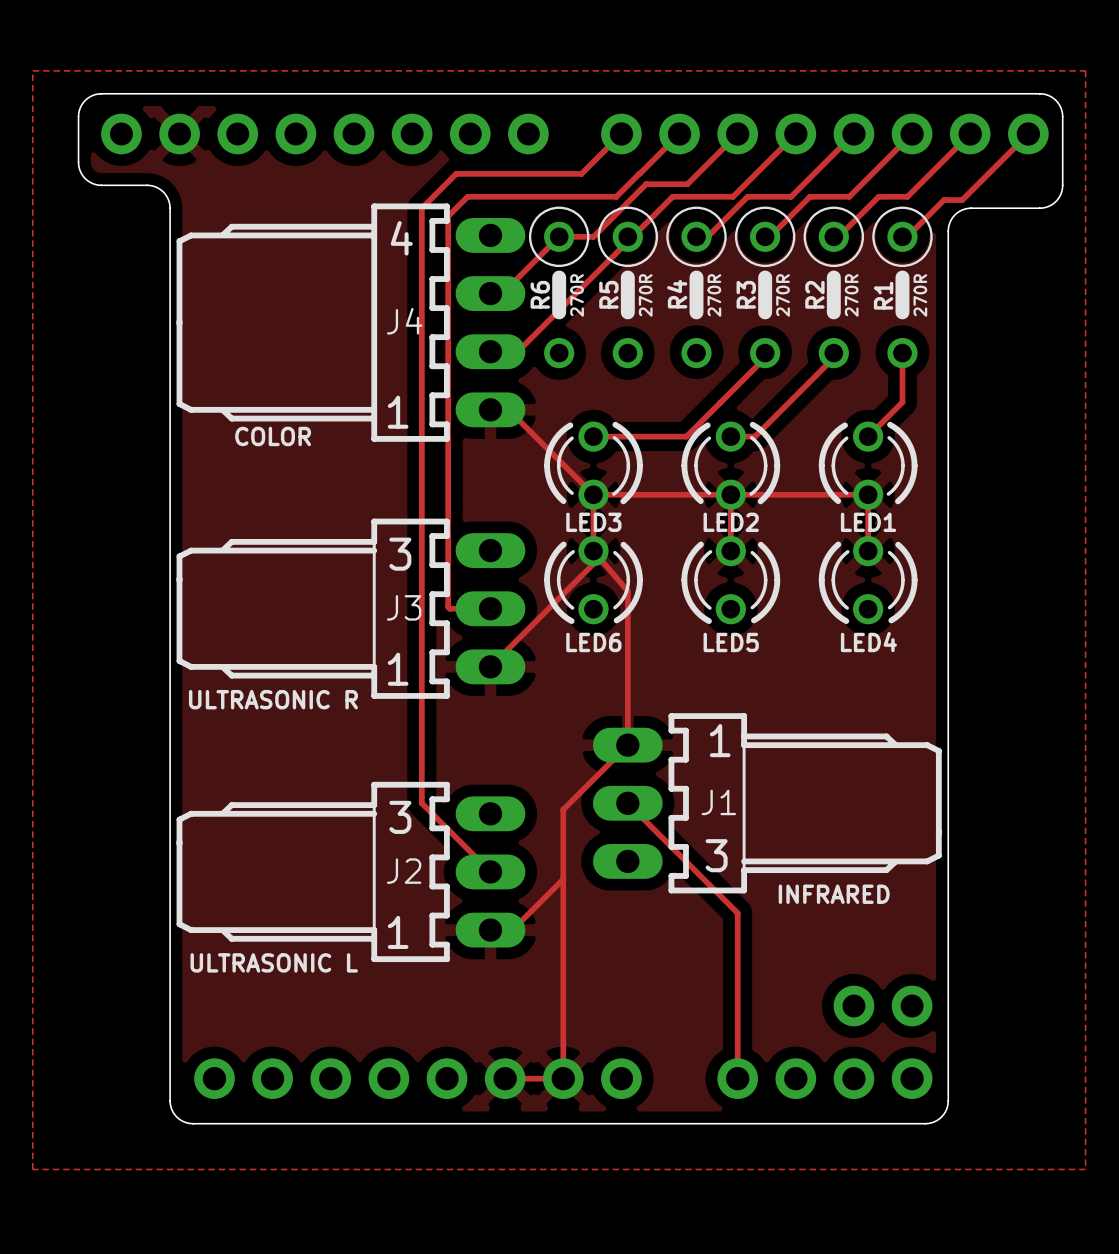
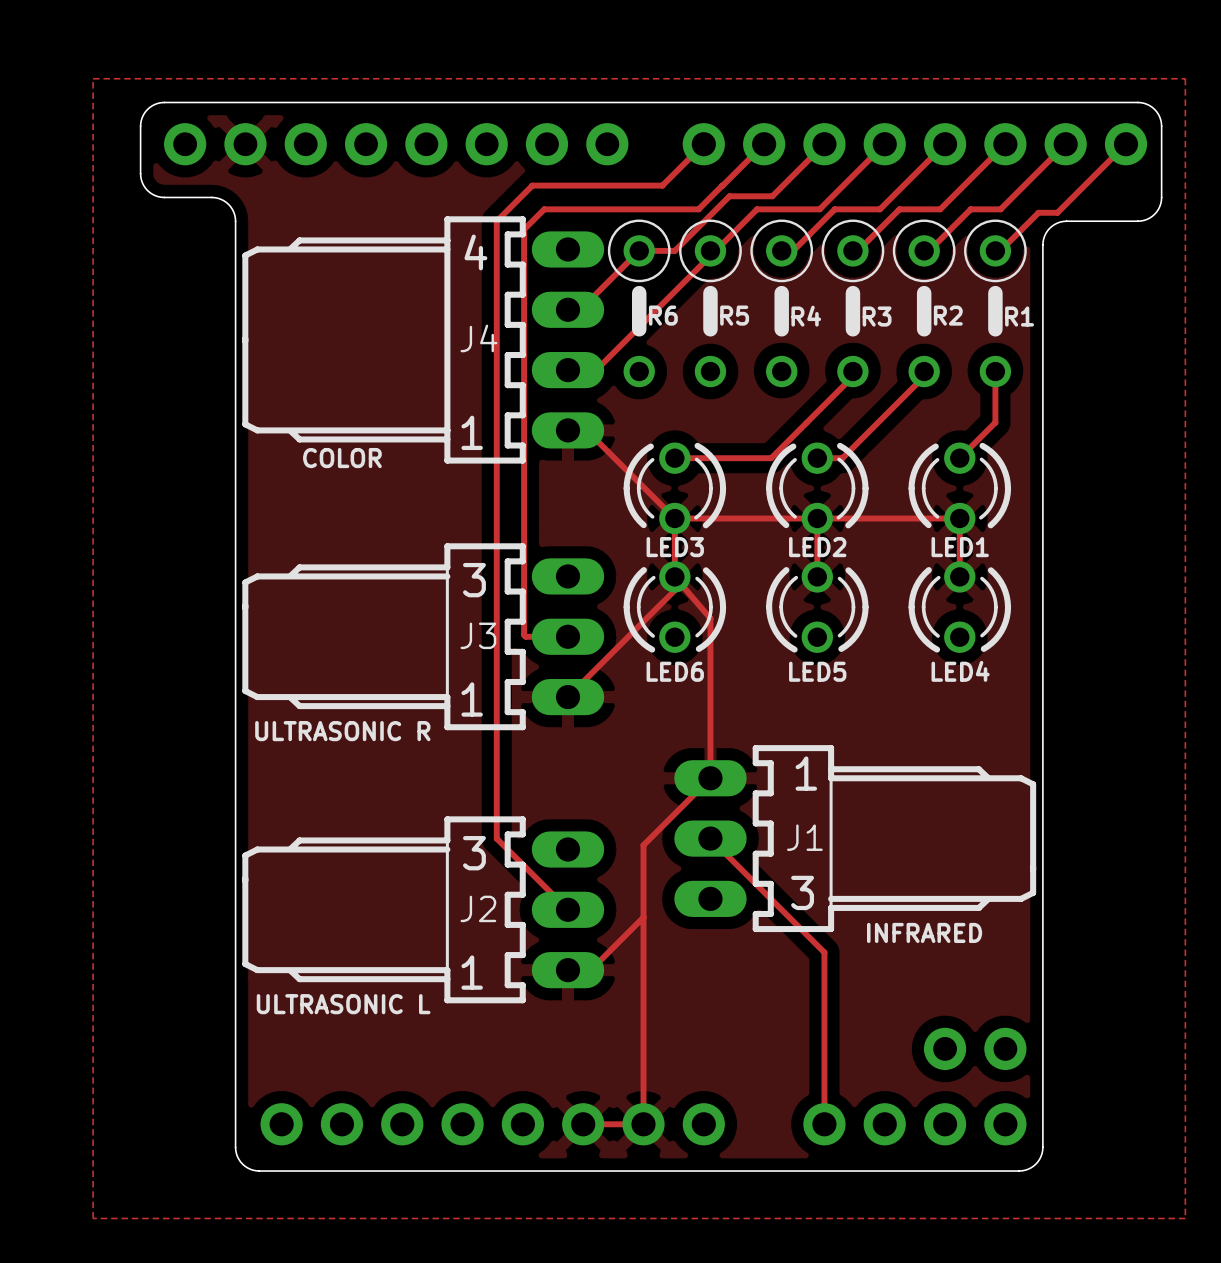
R6 name rotation: 0° (540, 294) -> 90° clockwise (663, 315)
R6 name position: R6 (540, 294) -> R6 (663, 315)
R5 name rotation: 0° (608, 294) -> 90° clockwise (734, 315)
R5 name position: R5 (608, 294) -> R5 (734, 315)
R4 name rotation: 0° (677, 294) -> 90° clockwise (806, 316)
R4 name position: R4 (677, 294) -> R4 (806, 316)
R3 name rotation: 0° (746, 294) -> 90° clockwise (877, 316)
R3 name position: R3 (746, 294) -> R3 (877, 316)
R2 name rotation: 0° (814, 294) -> 90° clockwise (948, 315)
R2 name position: R2 (814, 294) -> R2 (948, 315)
R6 value: 270R (577, 295) -> none
R5 value: 270R (645, 295) -> none
R4 value: 270R (714, 295) -> none
R3 value: 270R (783, 295) -> none
R2 value: 270R (851, 295) -> none
R1 name rotation: 0° (883, 295) -> 90° clockwise (1019, 316)
R1 name position: R1 (883, 295) -> R1 (1019, 316)
R1 value: 270R (920, 295) -> none

